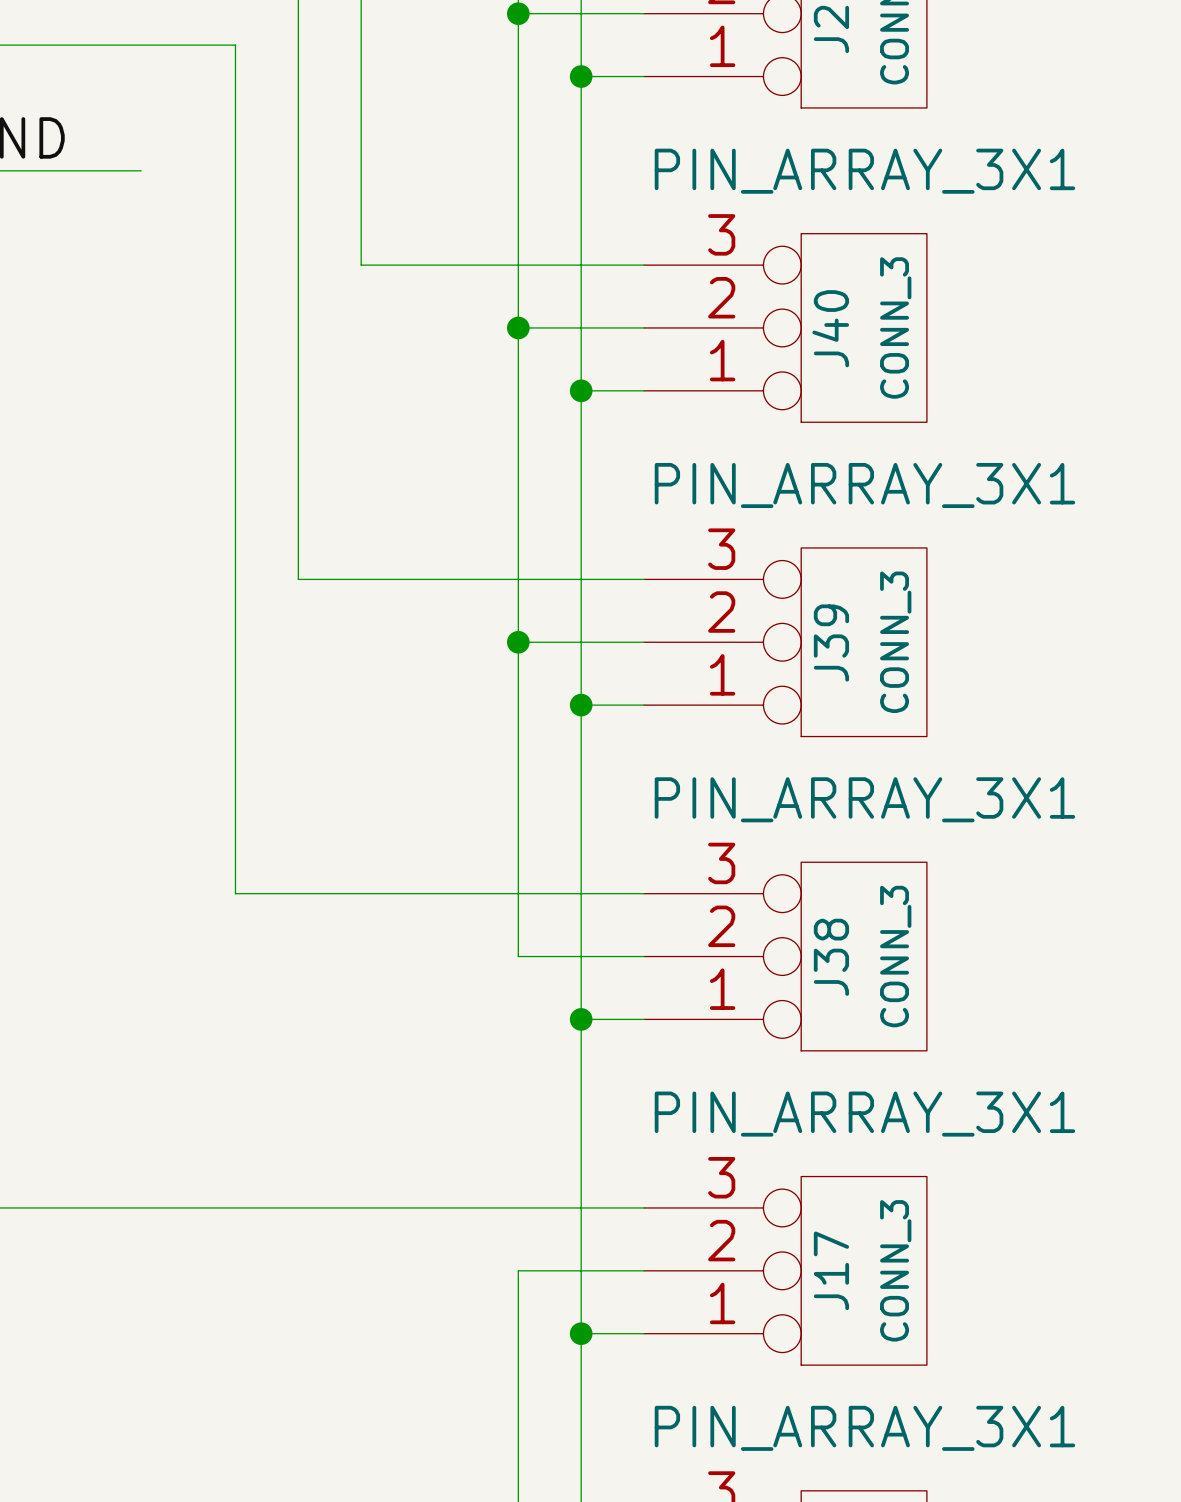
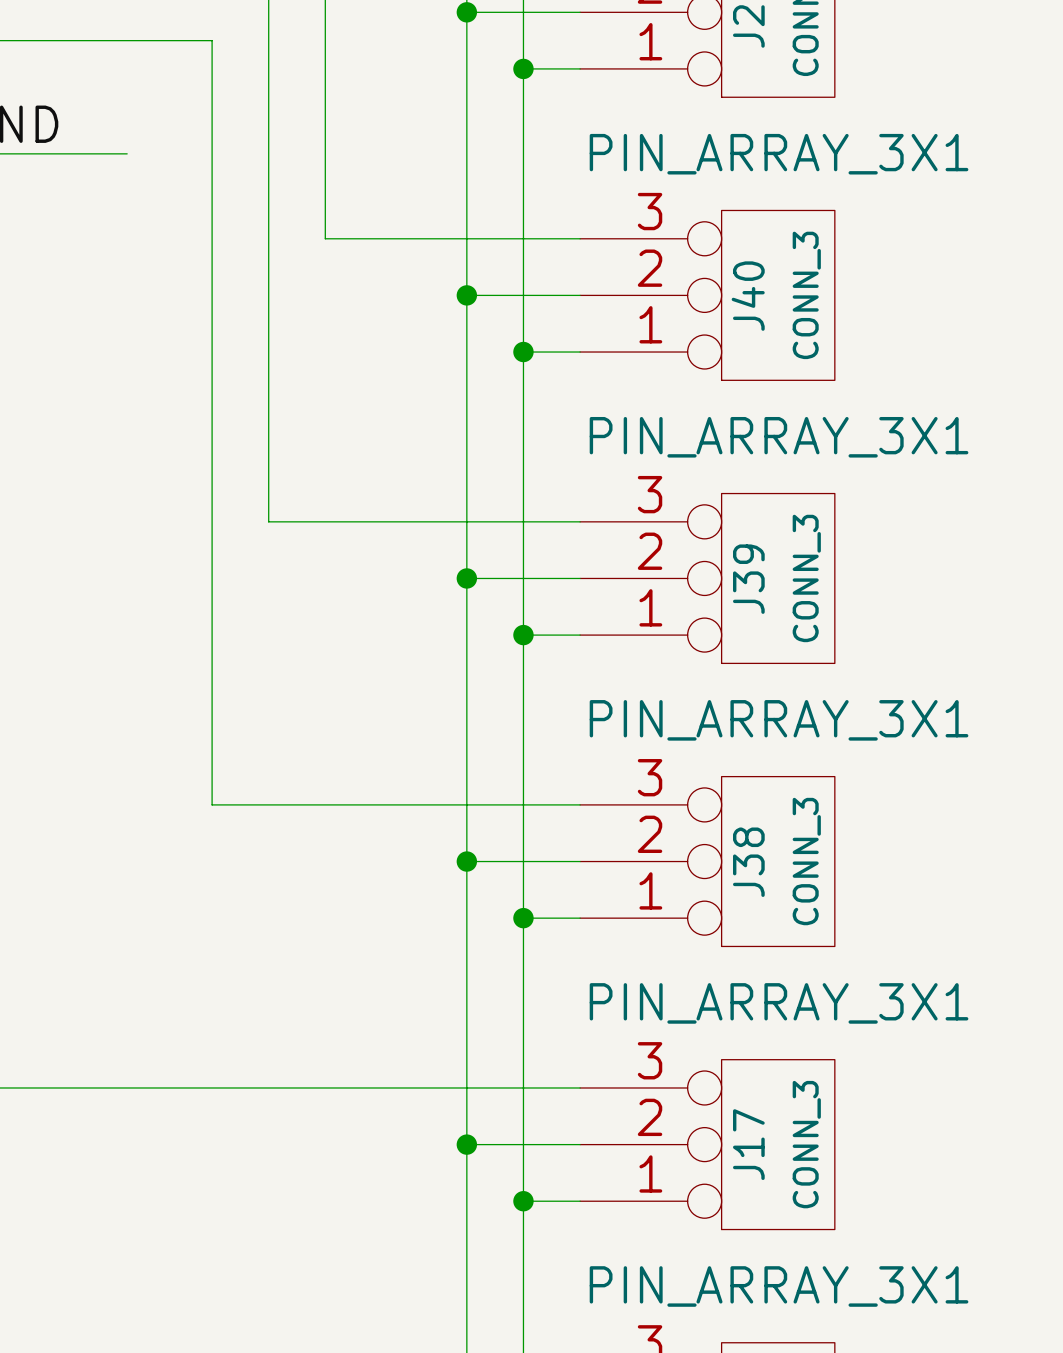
wire: none -> (466, 861) (466, 1144)
junction: none -> (466, 861)
junction: none -> (466, 1144)

